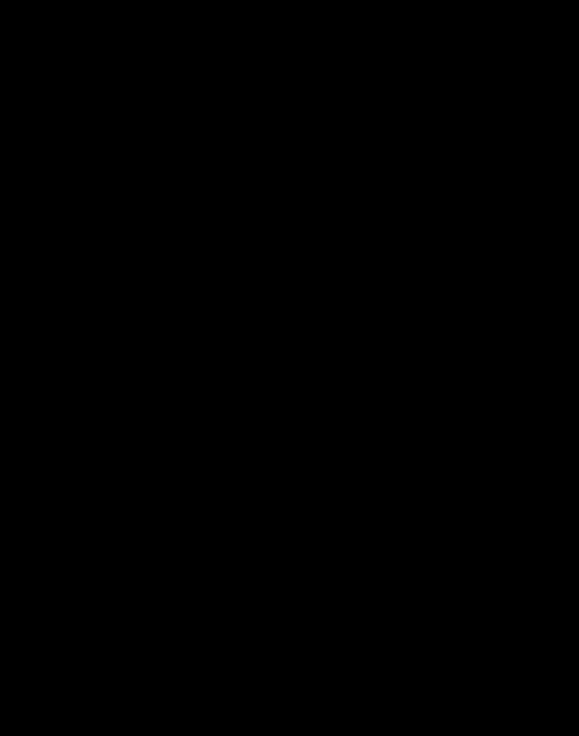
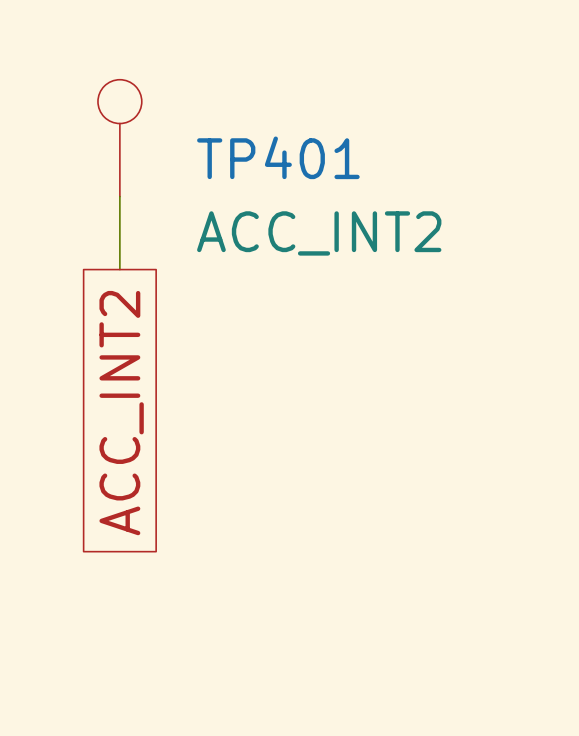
TP401: none -> ACC_INT2 (119, 138)
wire: none -> (119, 196) (119, 269)
global label: none -> ACC_INT2 (121, 413)

